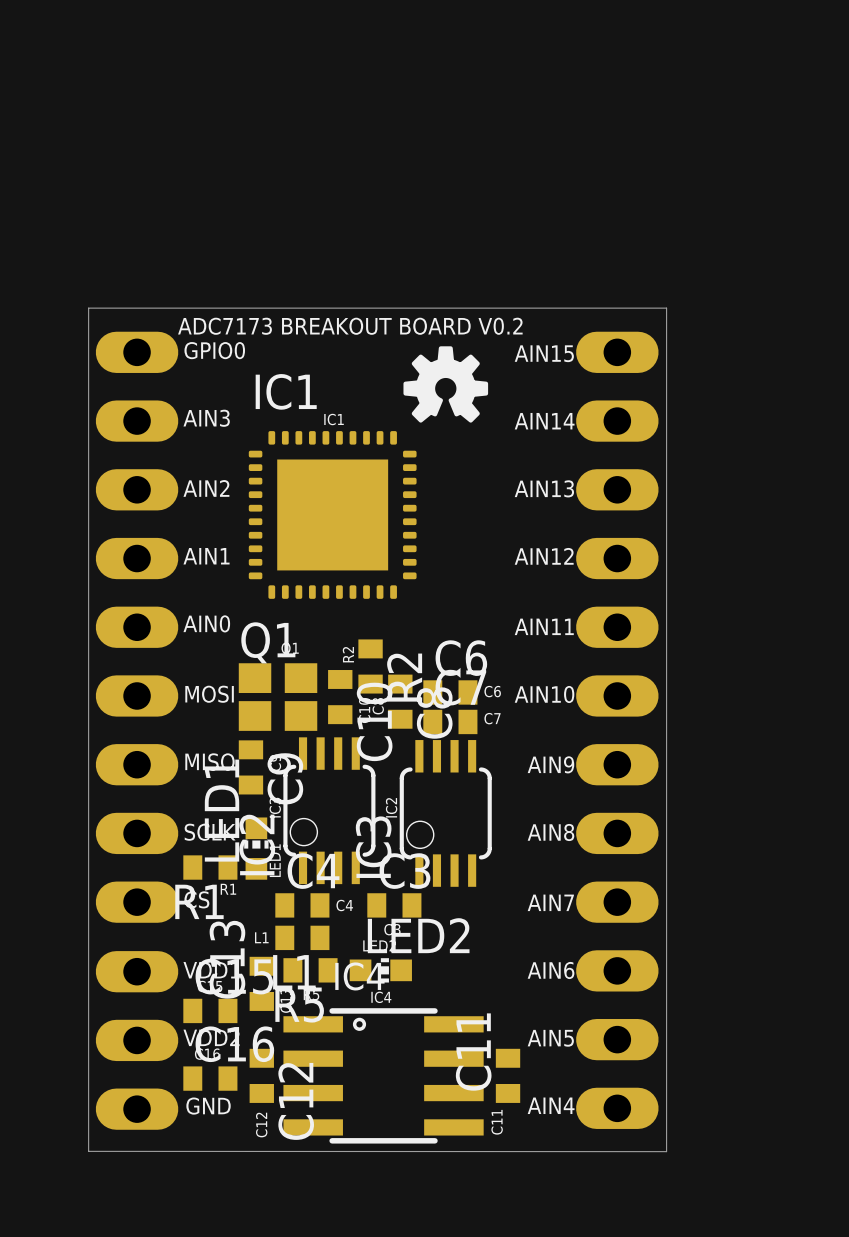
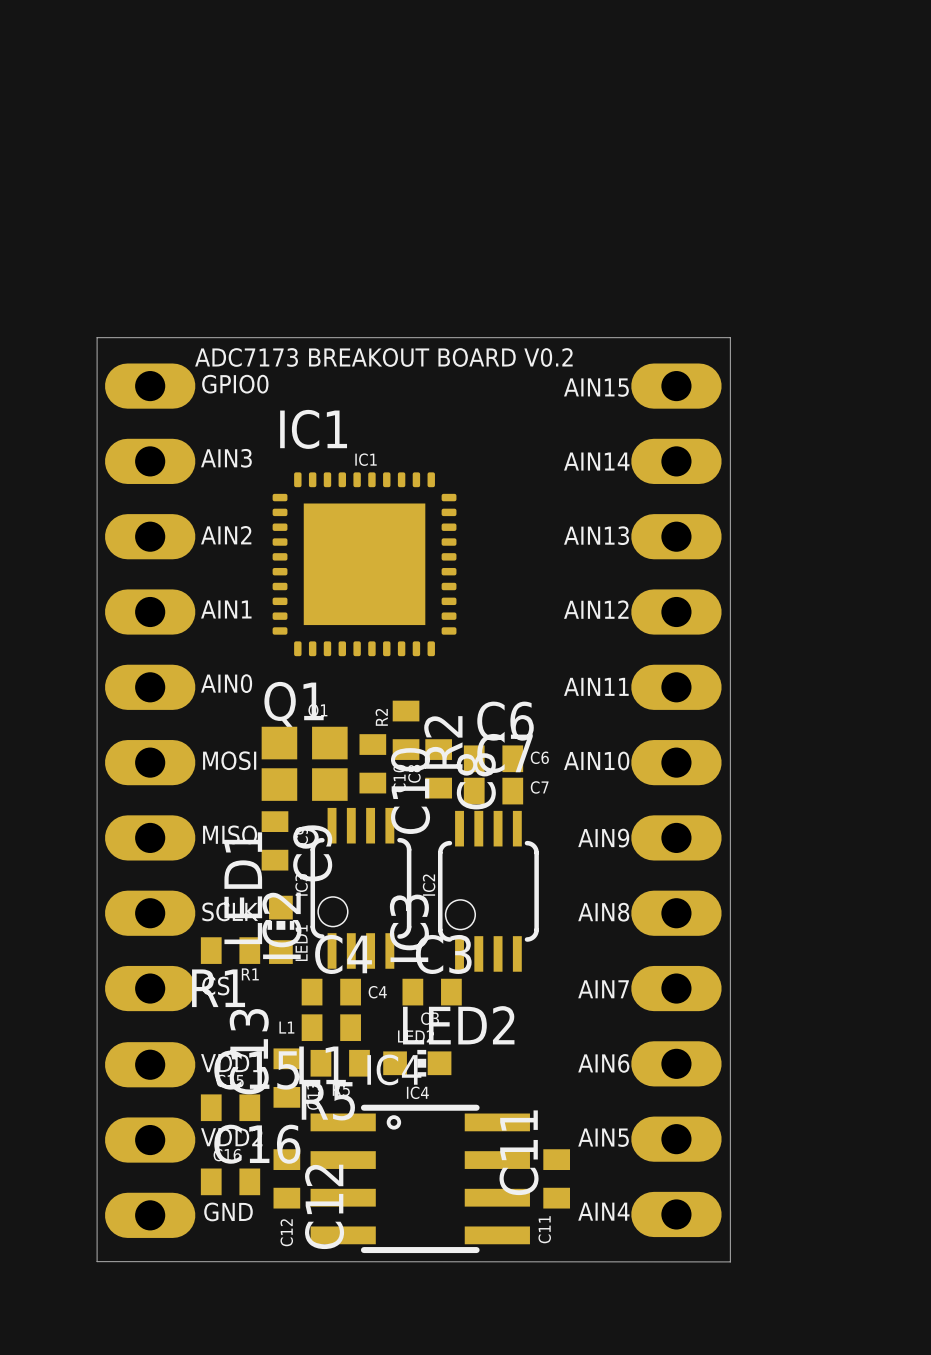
drawing: [403, 346, 489, 423] -> none

